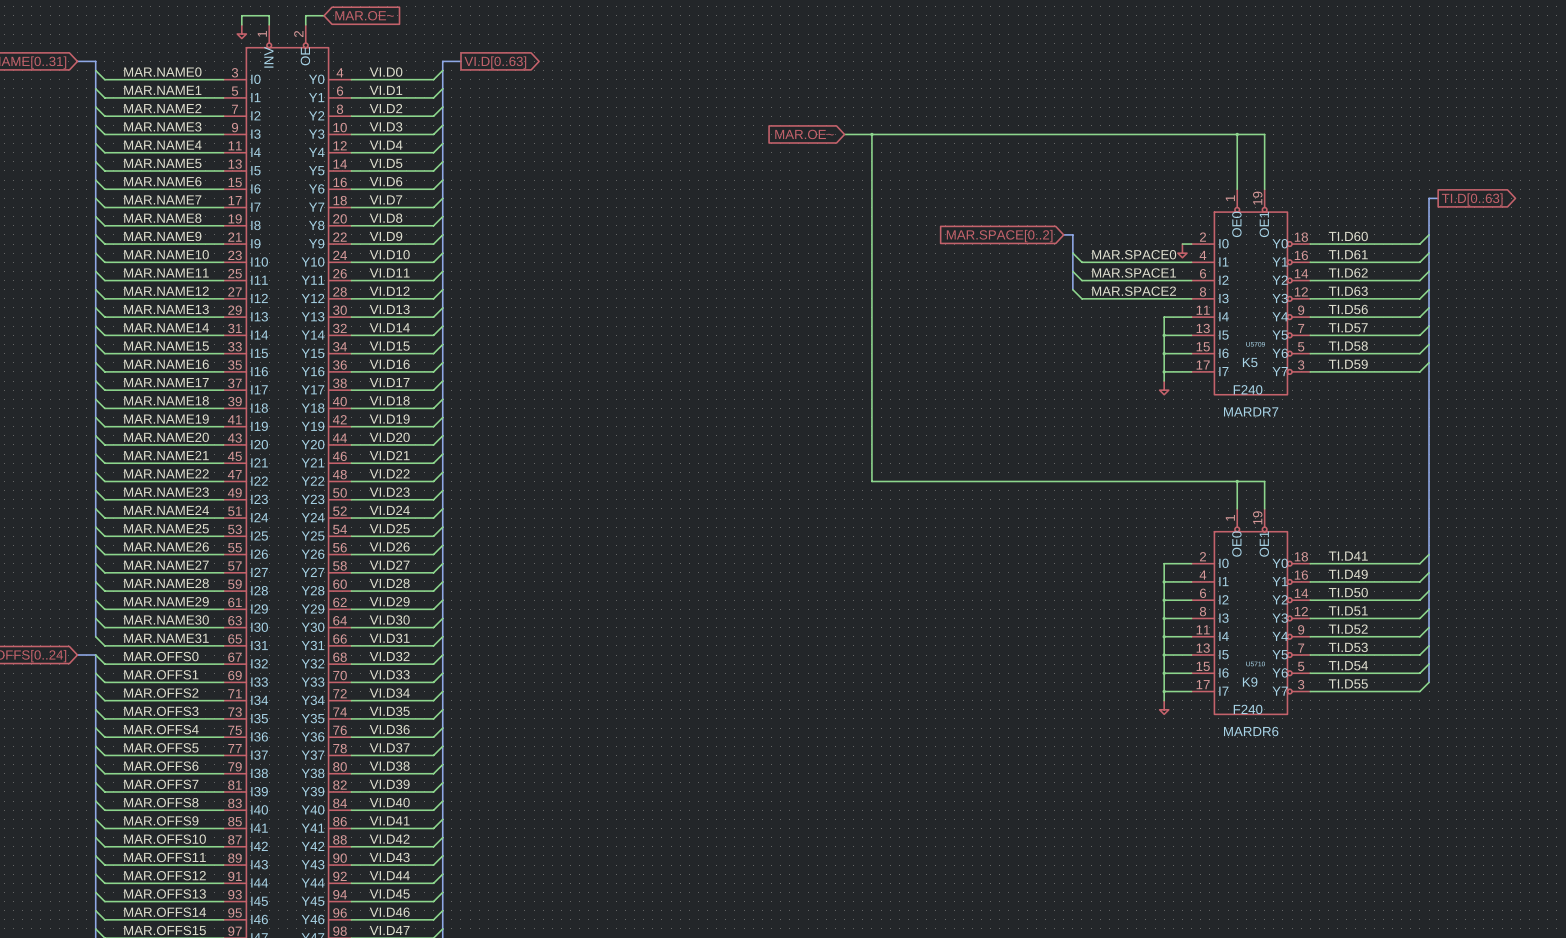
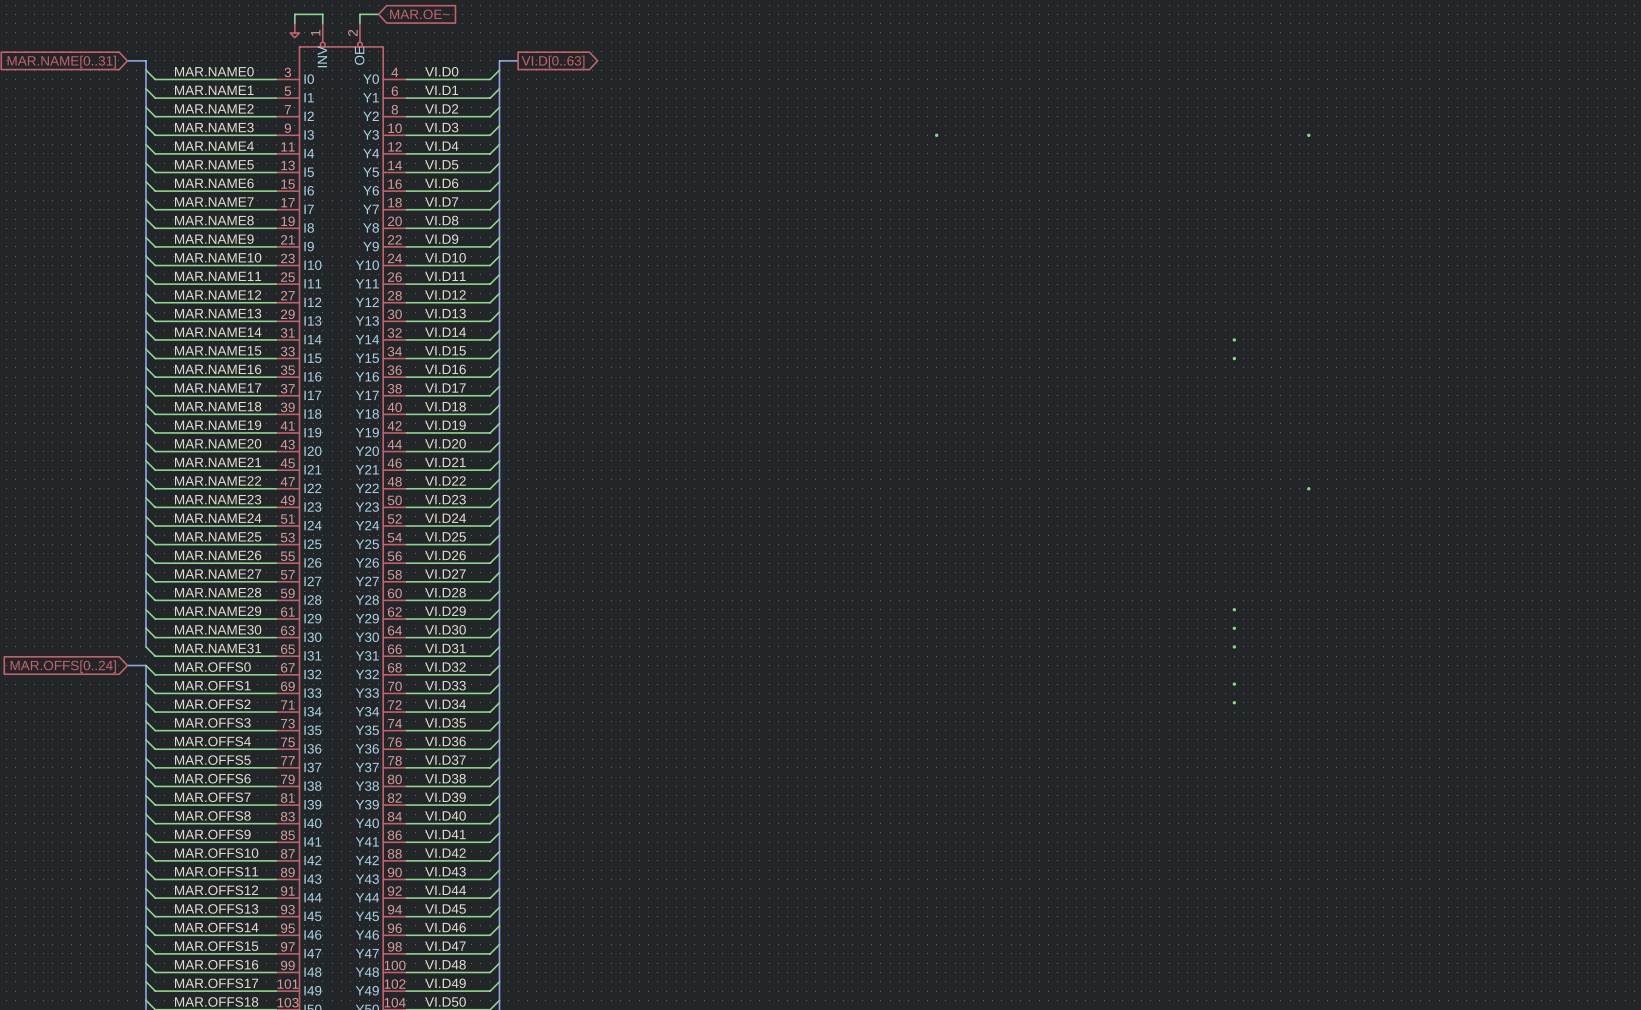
global label: MAR.OE~ (804, 134) -> none
wire: (844, 134) (1264, 134) (1264, 189) -> none
wire: (871, 134) (871, 481) (1264, 481) (1264, 508) -> none
wire: (1237, 134) (1237, 189) -> none
bus: (1438, 198) (1429, 198) (1429, 682) -> none
global label: TI.D[0..63] (1472, 199) -> none
bus: (1063, 234) (1072, 234) (1072, 289) -> none
wire: (1429, 234) (1419, 244) (1310, 244) -> none
global label: MAR.SPACE[0..2] (999, 236) -> none
label: TI.D60 (1348, 236) -> none
wire: (1182, 244) (1191, 244) -> none
power symbol: (1182, 251) -> none
wire: (1072, 253) (1081, 262) (1191, 262) -> none
wire: (1429, 253) (1419, 262) (1310, 262) -> none
label: MAR.SPACE0 (1134, 254) -> none
label: TI.D61 (1348, 254) -> none
wire: (1072, 271) (1081, 280) (1191, 280) -> none
wire: (1429, 271) (1419, 280) (1310, 280) -> none
label: MAR.SPACE1 (1134, 272) -> none
label: TI.D62 (1348, 272) -> none
wire: (1072, 289) (1081, 298) (1191, 298) -> none
wire: (1429, 289) (1419, 298) (1310, 298) -> none
label: MAR.SPACE2 (1134, 291) -> none
part: F240 (1250, 291) -> none
label: TI.D63 (1348, 291) -> none
wire: (1429, 307) (1419, 317) (1310, 317) -> none
label: TI.D56 (1348, 309) -> none
wire: (1191, 317) (1164, 317) (1164, 381) -> none
wire: (1429, 326) (1419, 335) (1310, 335) -> none
label: TI.D57 (1348, 327) -> none
wire: (1164, 335) (1191, 335) -> none
wire: (1429, 344) (1419, 353) (1310, 353) -> none
label: TI.D58 (1348, 346) -> none
wire: (1164, 353) (1191, 353) -> none
wire: (1429, 362) (1419, 371) (1310, 371) -> none
label: TI.D59 (1348, 364) -> none
wire: (1164, 371) (1191, 371) -> none
power symbol: (1164, 388) -> none
wire: (1237, 481) (1237, 508) -> none
wire: (1429, 554) (1419, 563) (1310, 563) -> none
label: TI.D41 (1348, 556) -> none
wire: (1191, 563) (1164, 563) (1164, 700) -> none
wire: (1429, 572) (1419, 581) (1310, 581) -> none
label: TI.D49 (1348, 574) -> none
wire: (1164, 581) (1191, 581) -> none
wire: (1429, 591) (1419, 600) (1310, 600) -> none
label: TI.D50 (1348, 592) -> none
wire: (1164, 600) (1191, 600) -> none
wire: (1429, 609) (1419, 618) (1310, 618) -> none
label: TI.D51 (1348, 610) -> none
part: F240 (1250, 611) -> none
wire: (1164, 618) (1191, 618) -> none
wire: (1429, 627) (1419, 636) (1310, 636) -> none
label: TI.D52 (1348, 629) -> none
wire: (1164, 636) (1191, 636) -> none
wire: (1429, 645) (1419, 655) (1310, 655) -> none
label: TI.D53 (1348, 647) -> none
wire: (1164, 655) (1191, 655) -> none
wire: (1429, 664) (1419, 673) (1310, 673) -> none
label: TI.D54 (1348, 665) -> none
wire: (1164, 673) (1191, 673) -> none
wire: (1429, 682) (1419, 691) (1310, 691) -> none
label: TI.D55 (1348, 683) -> none
wire: (1164, 691) (1191, 691) -> none
power symbol: (1164, 707) -> none

